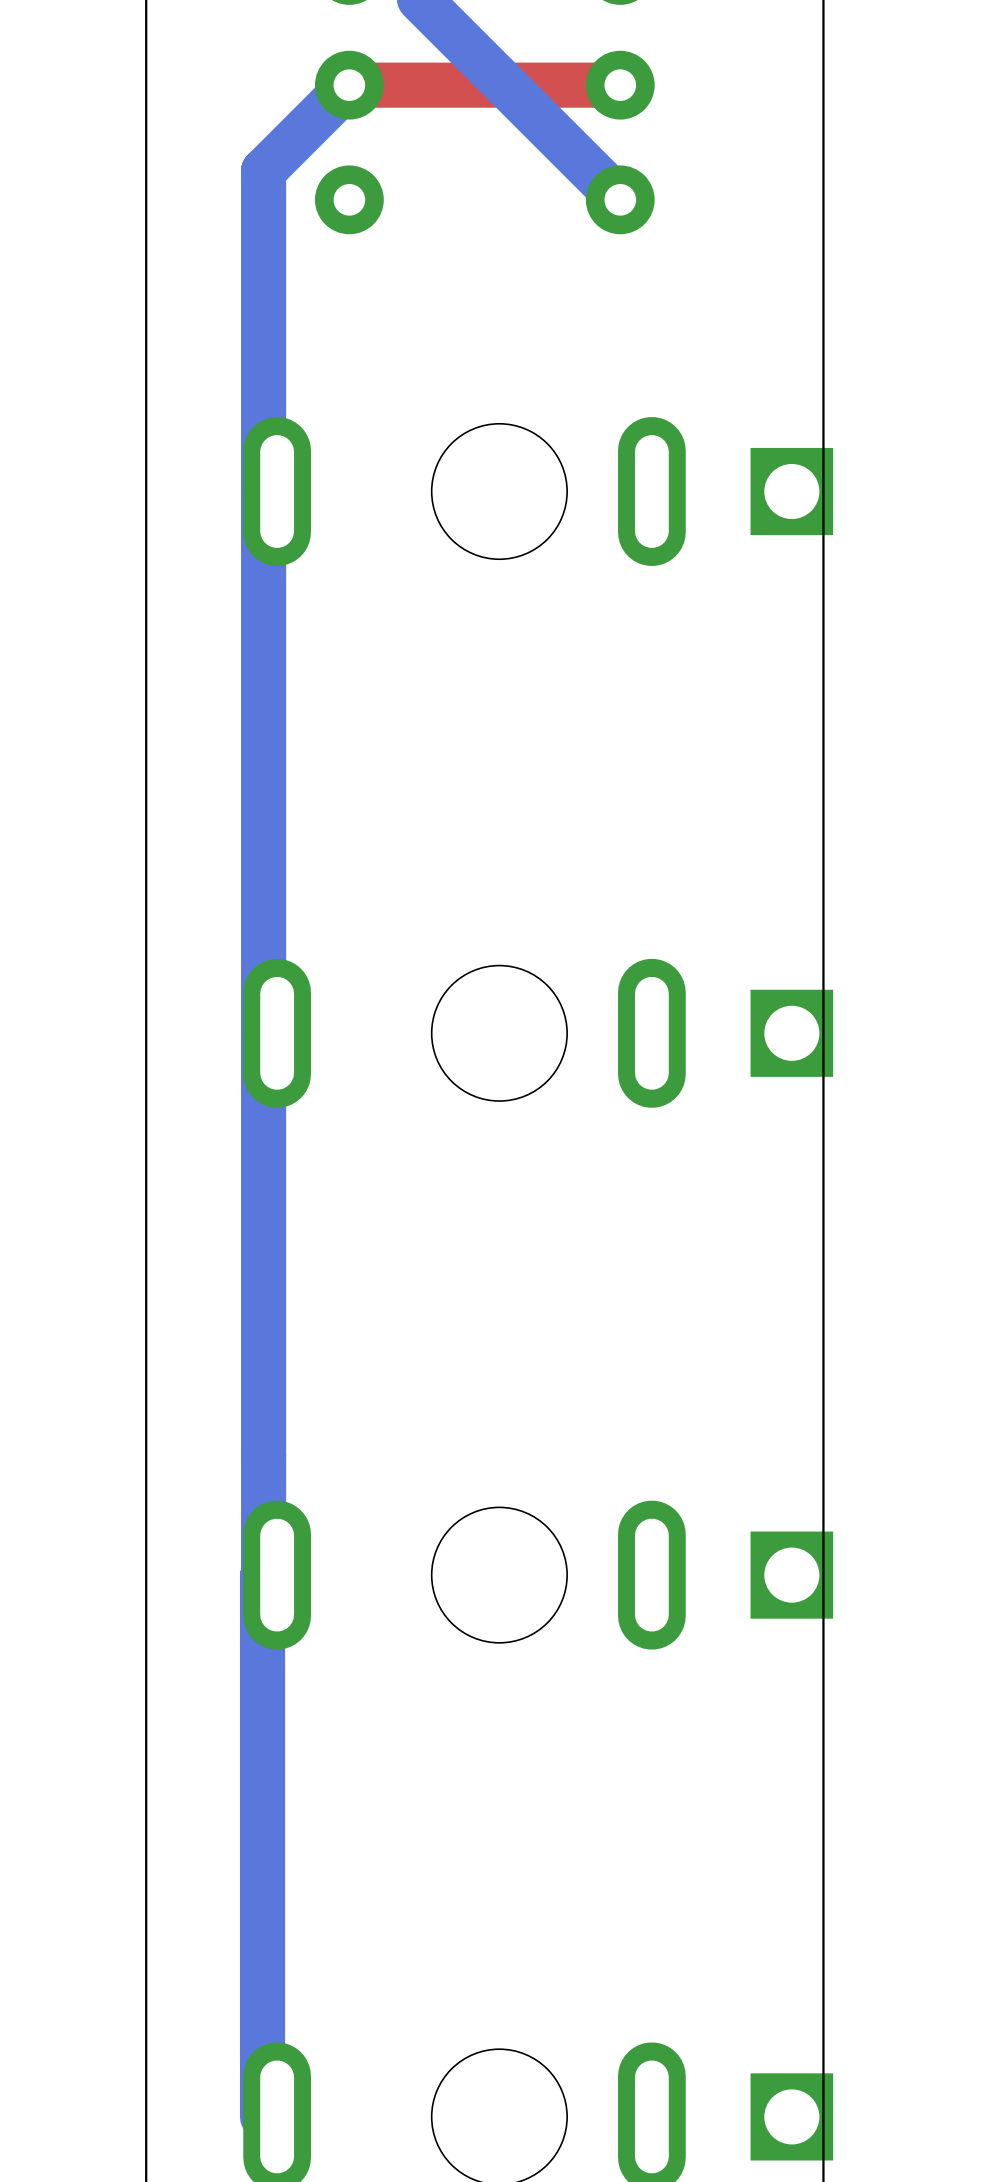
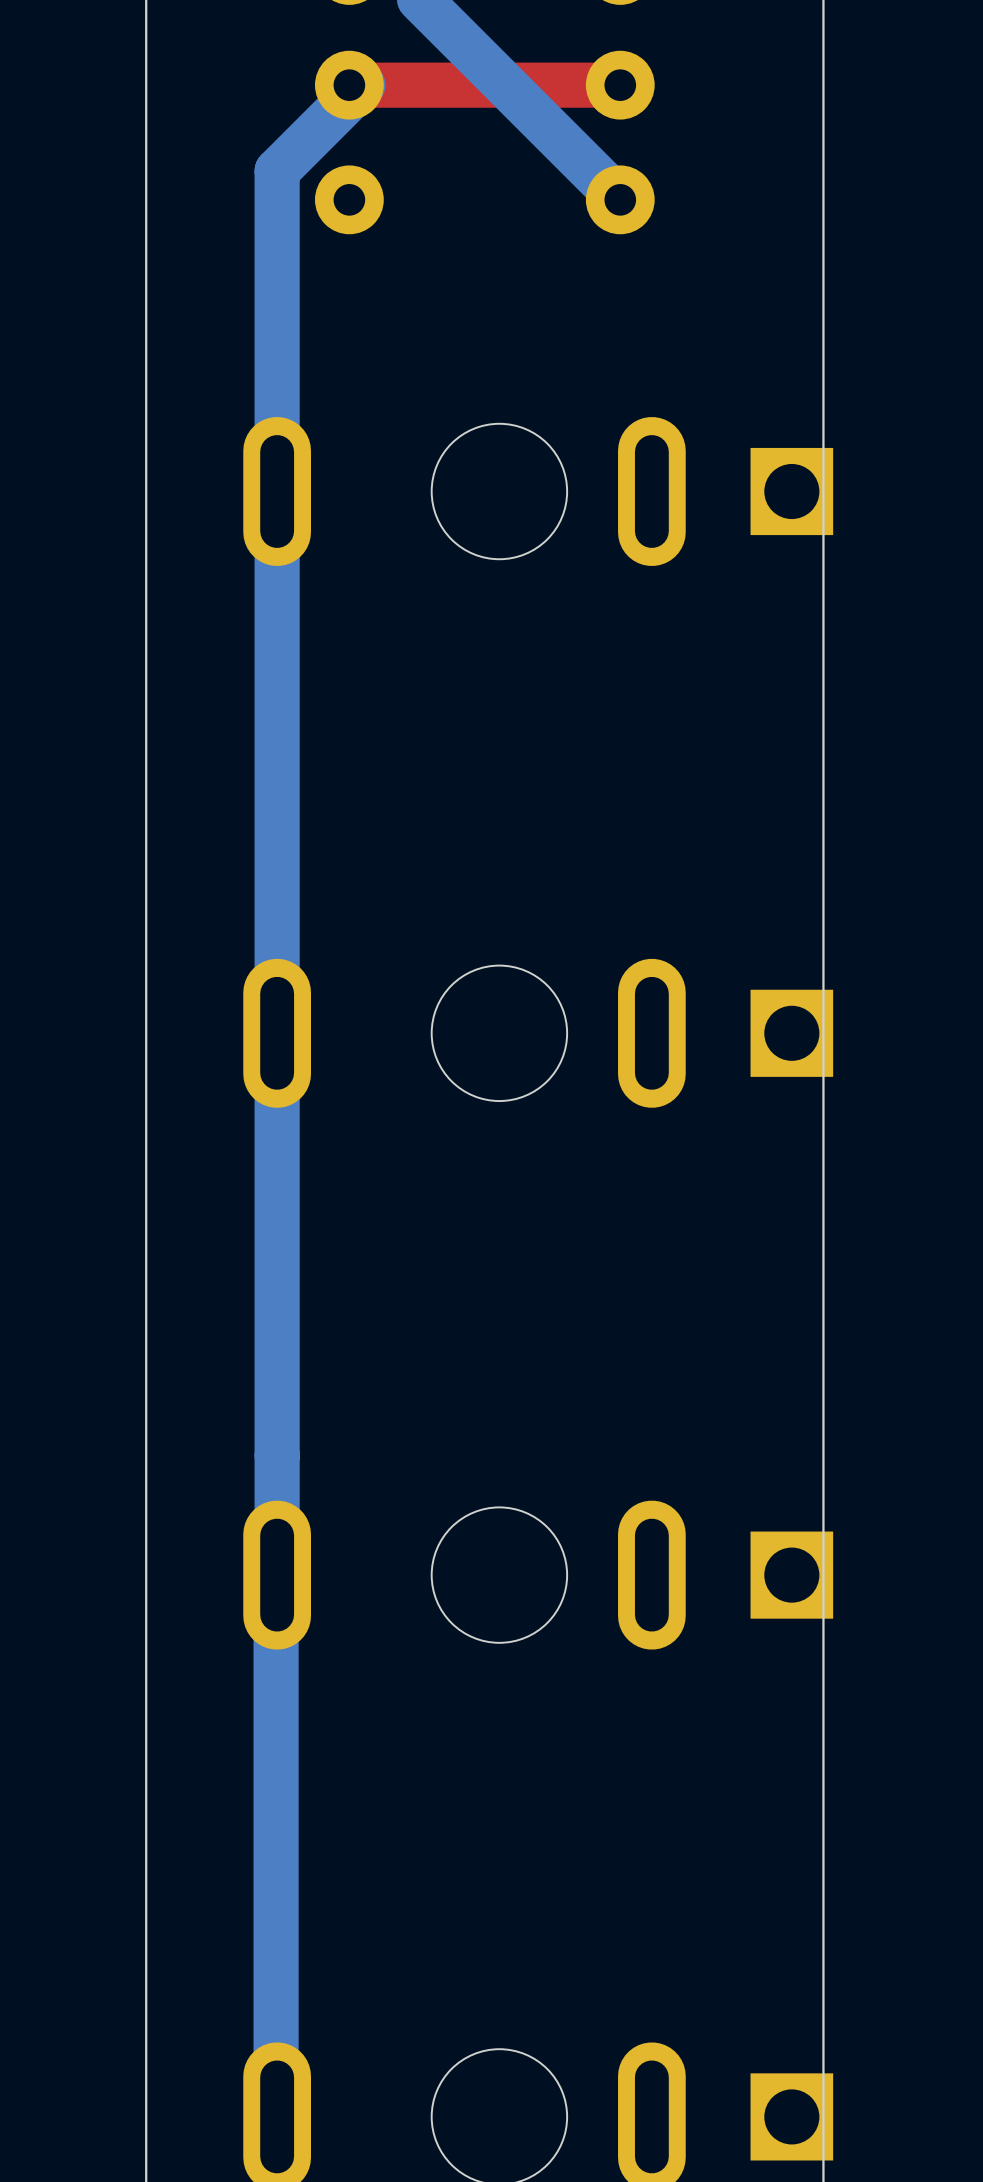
bottom track: (349, 85) (263, 170) (262, 2116) -> (362, 85) (277, 170) (276, 2116)

